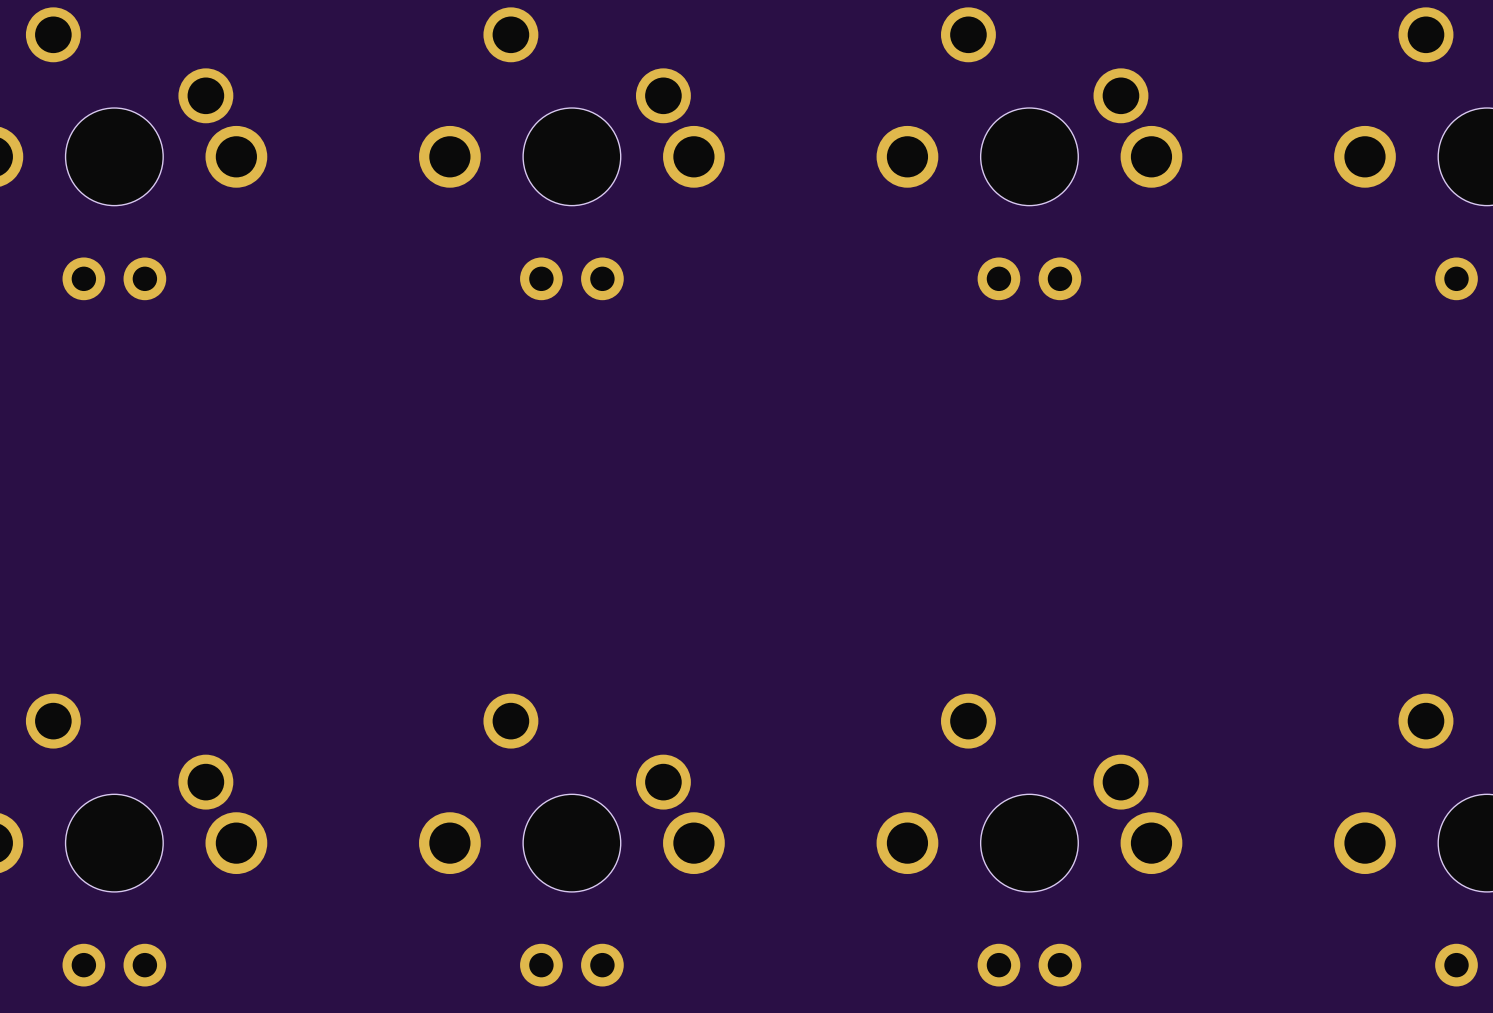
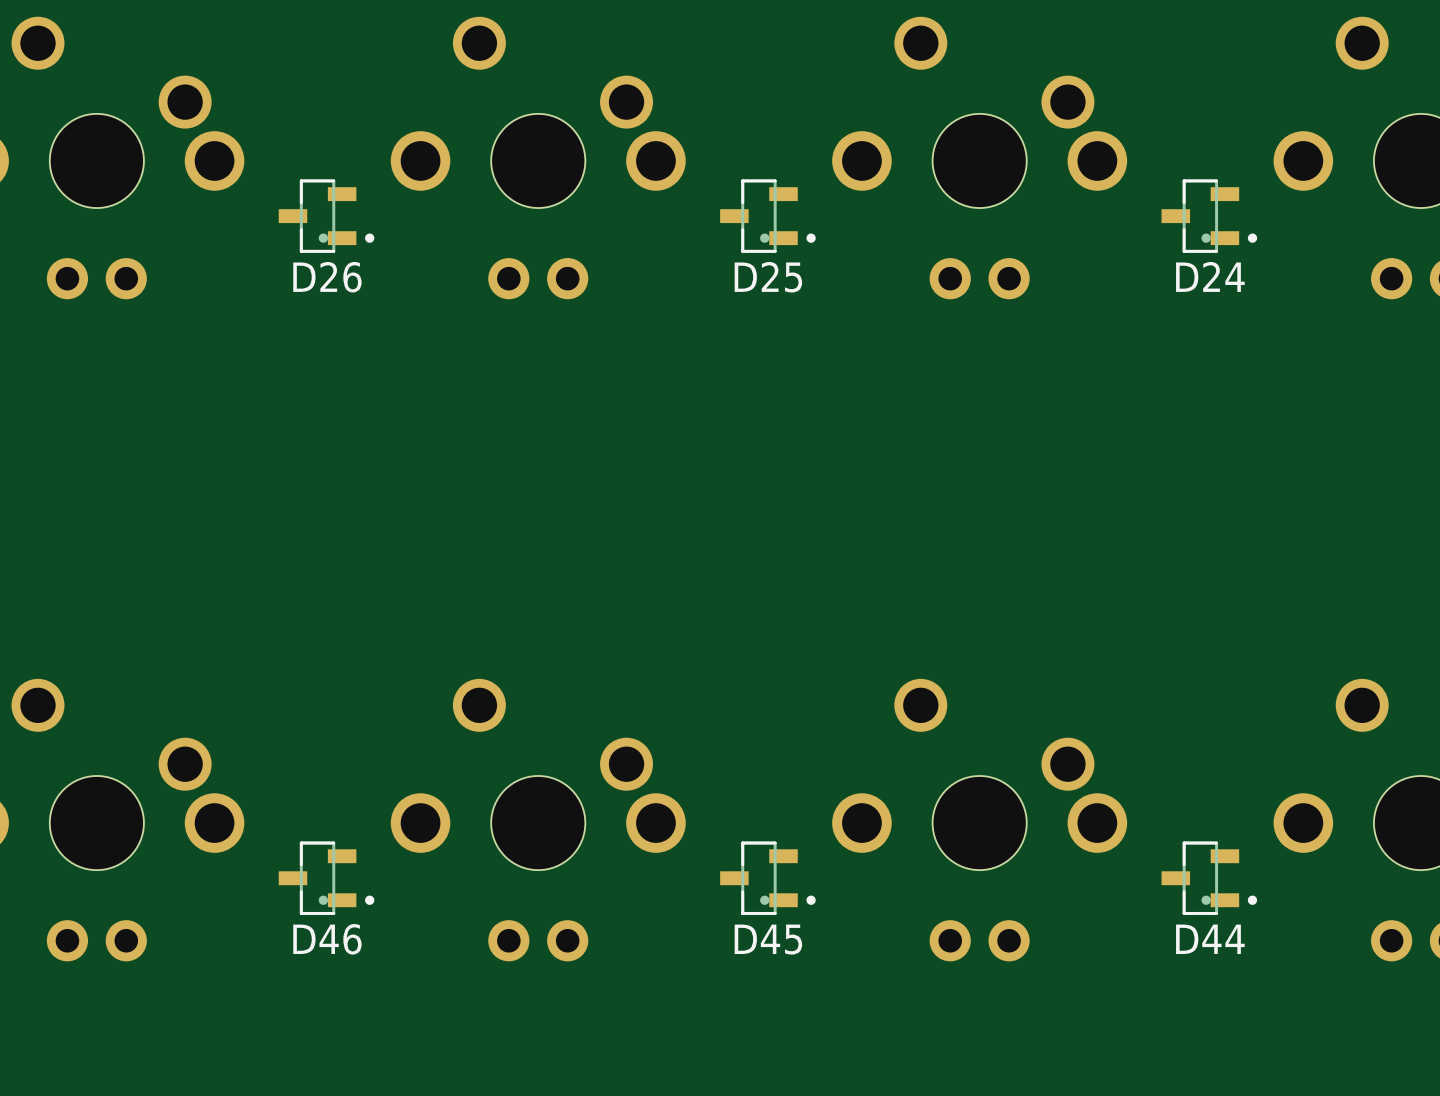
D26: none -> (326, 216)
D25: none -> (767, 216)
D24: none -> (1209, 216)
D46: none -> (326, 878)
D45: none -> (767, 878)
D44: none -> (1209, 878)

